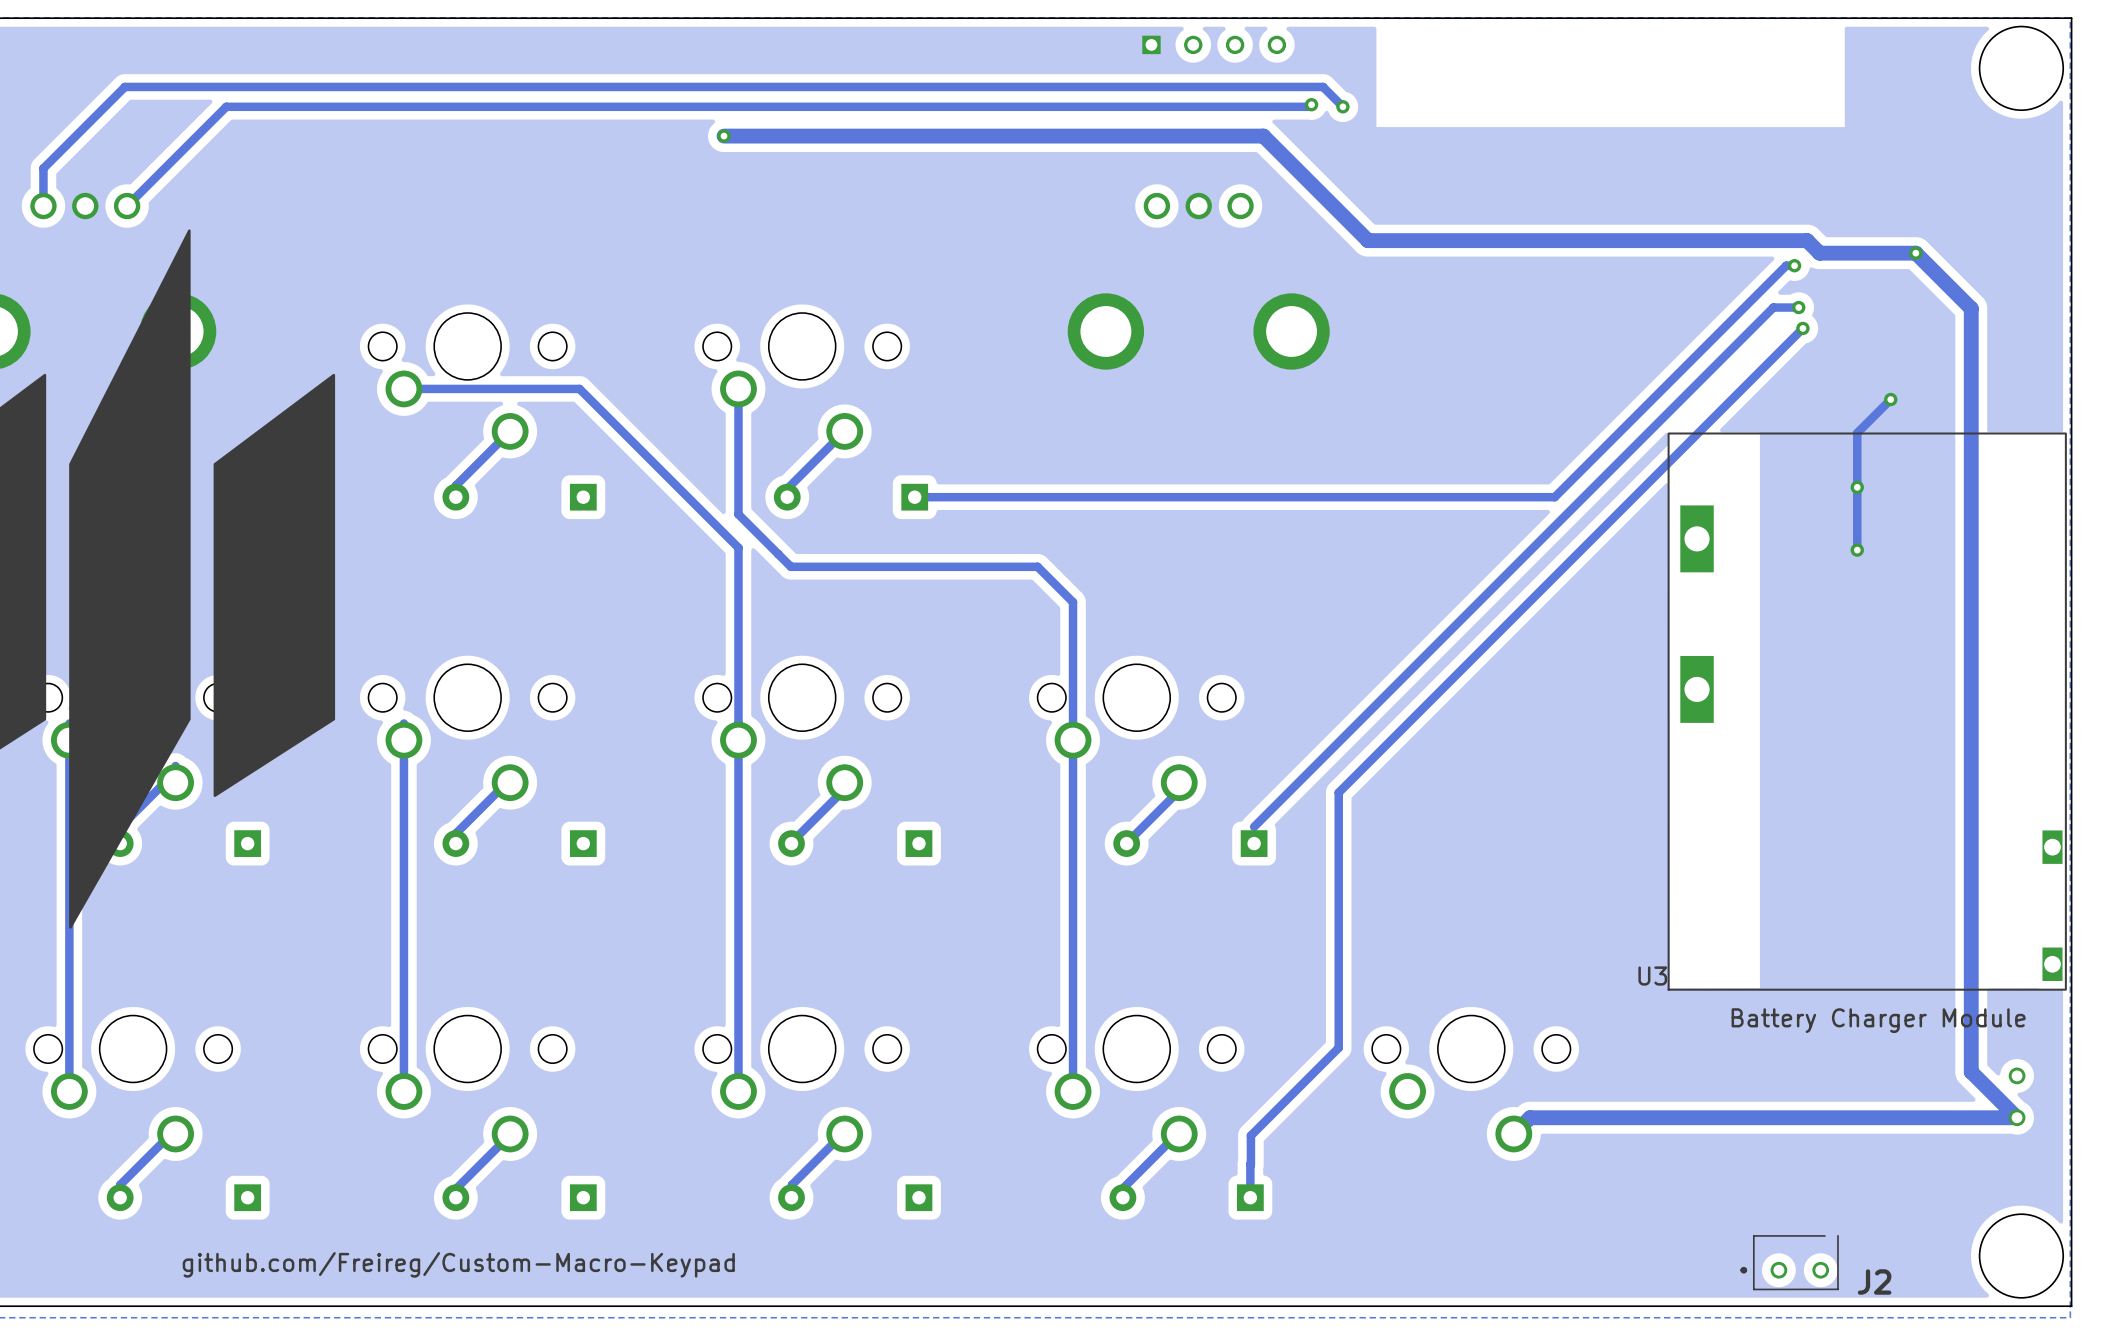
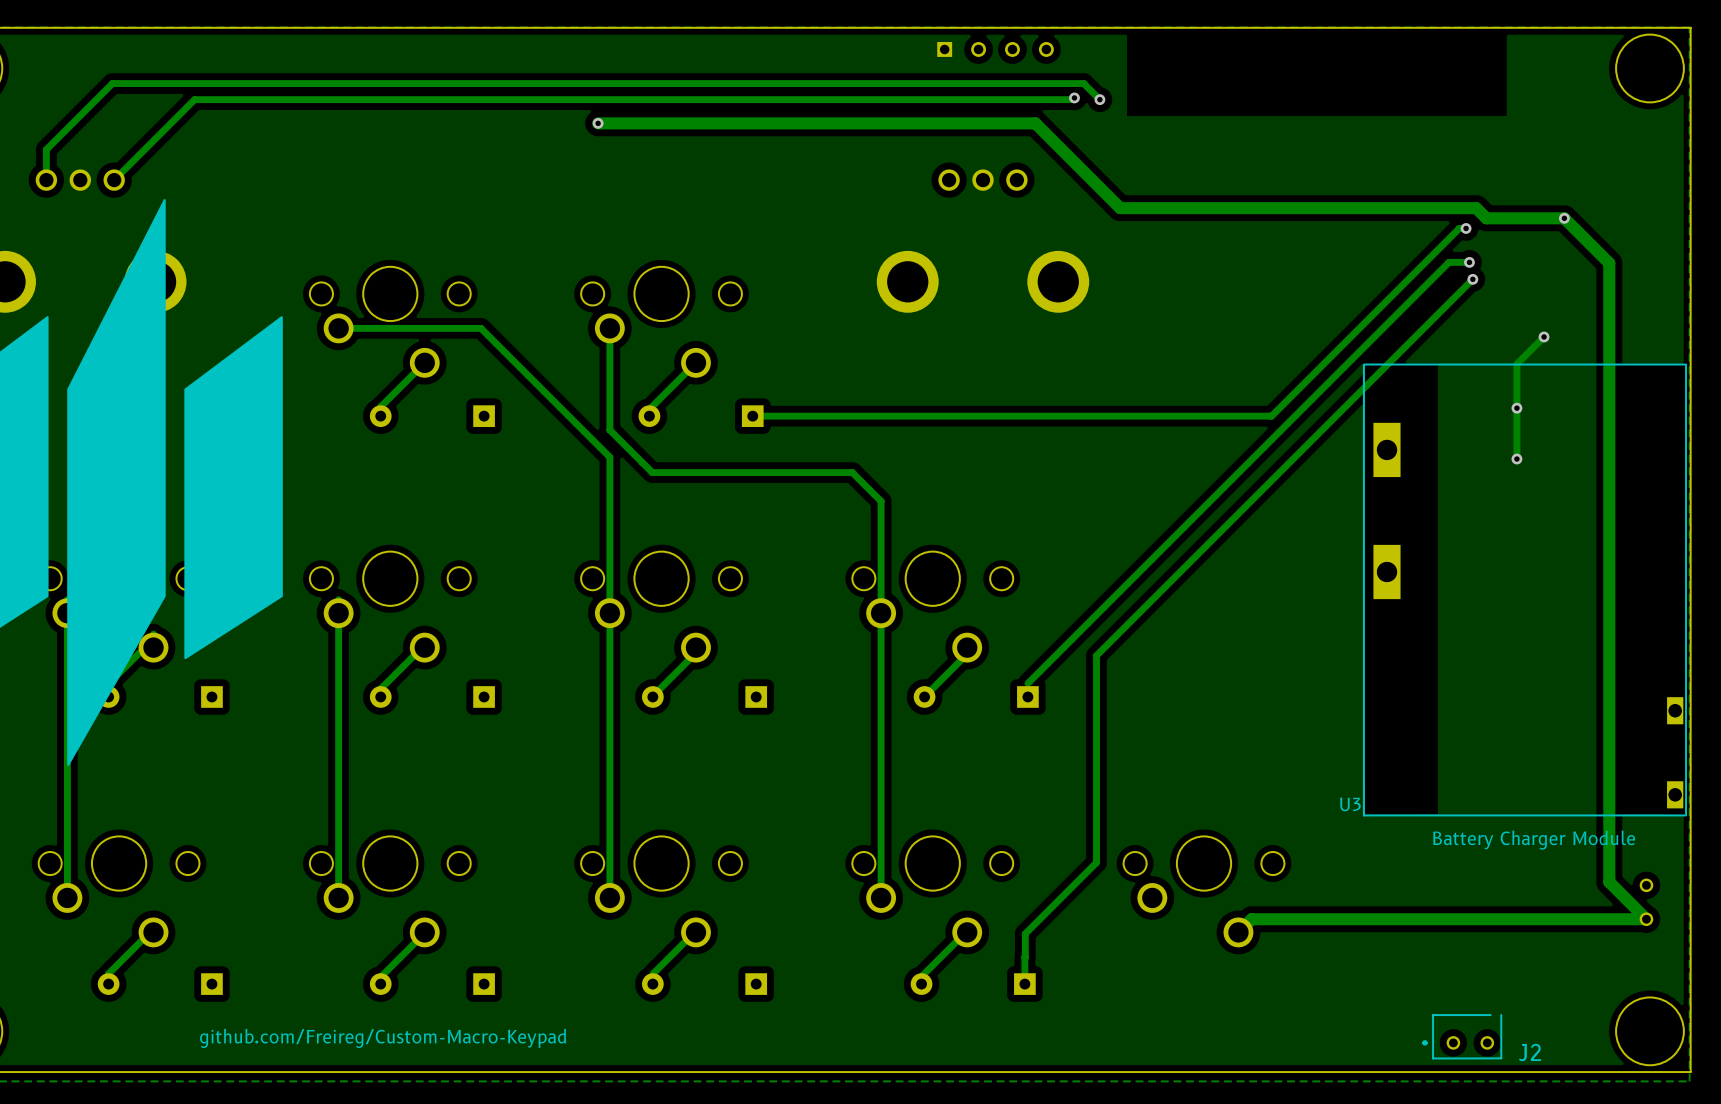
U3 footprint: [1667, 432, 2067, 991] -> [1363, 363, 1687, 817]

